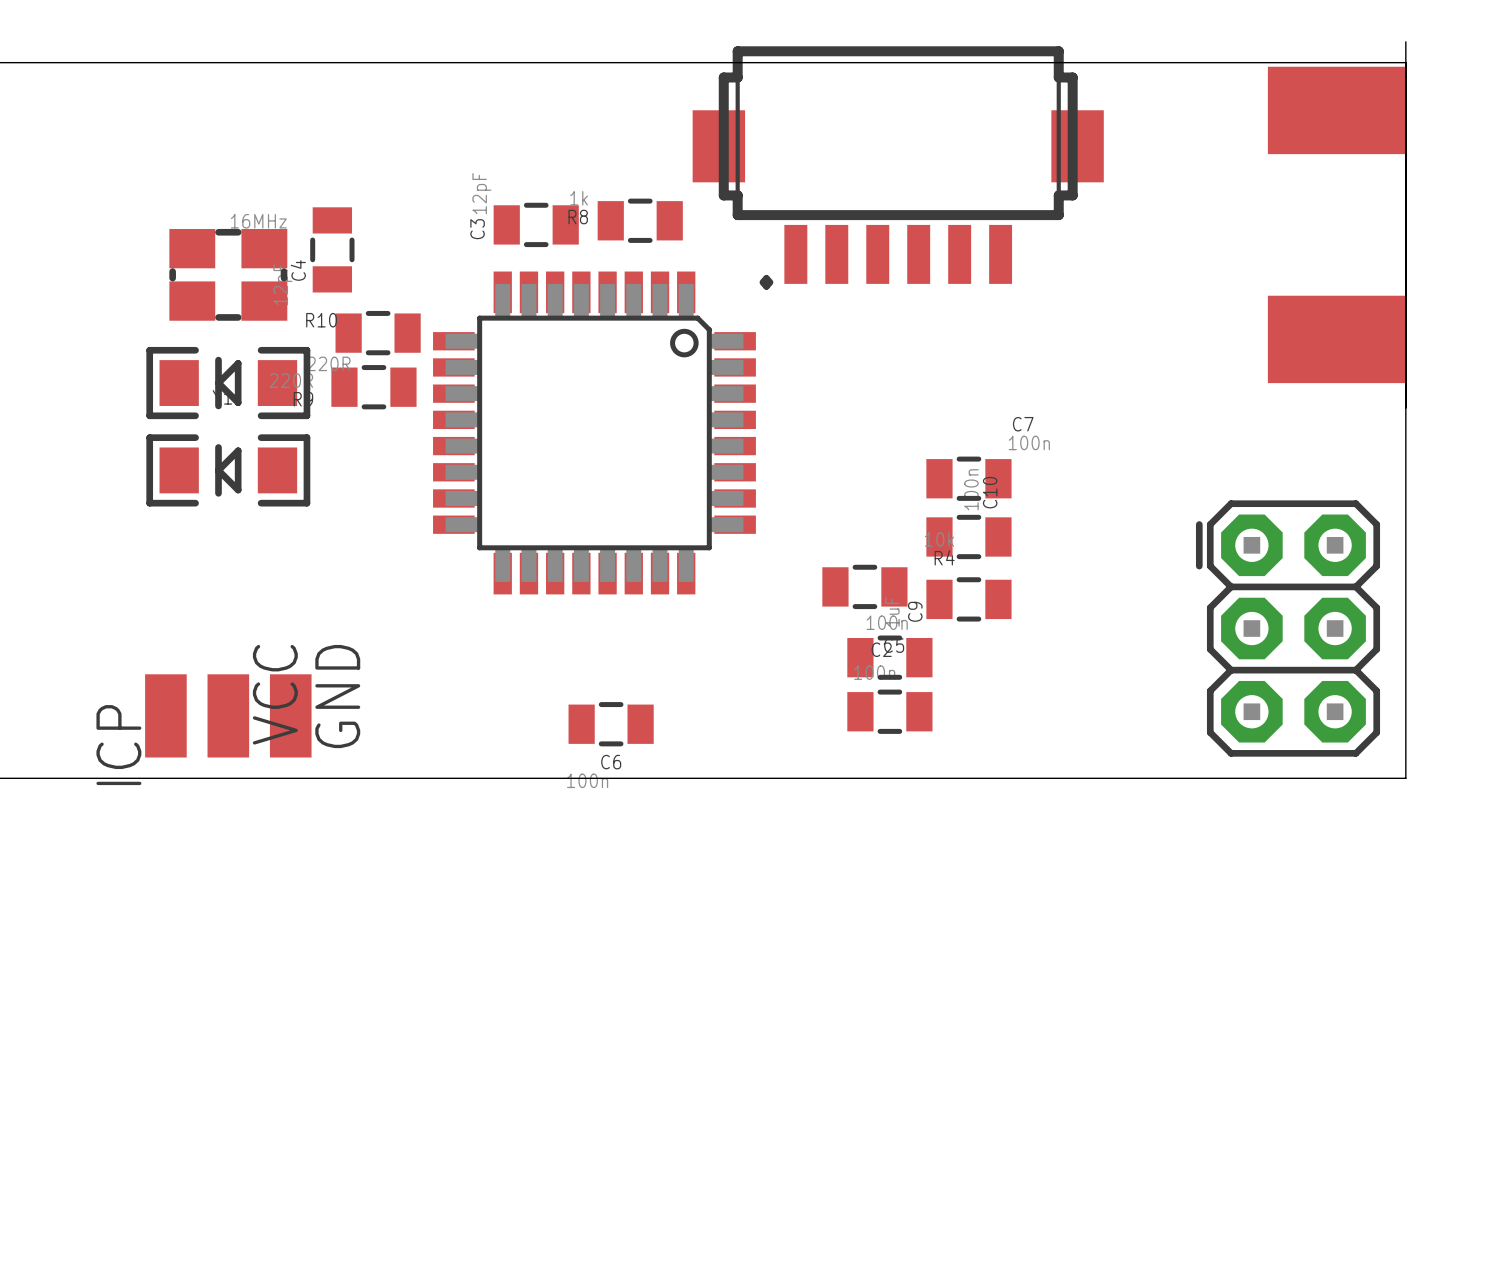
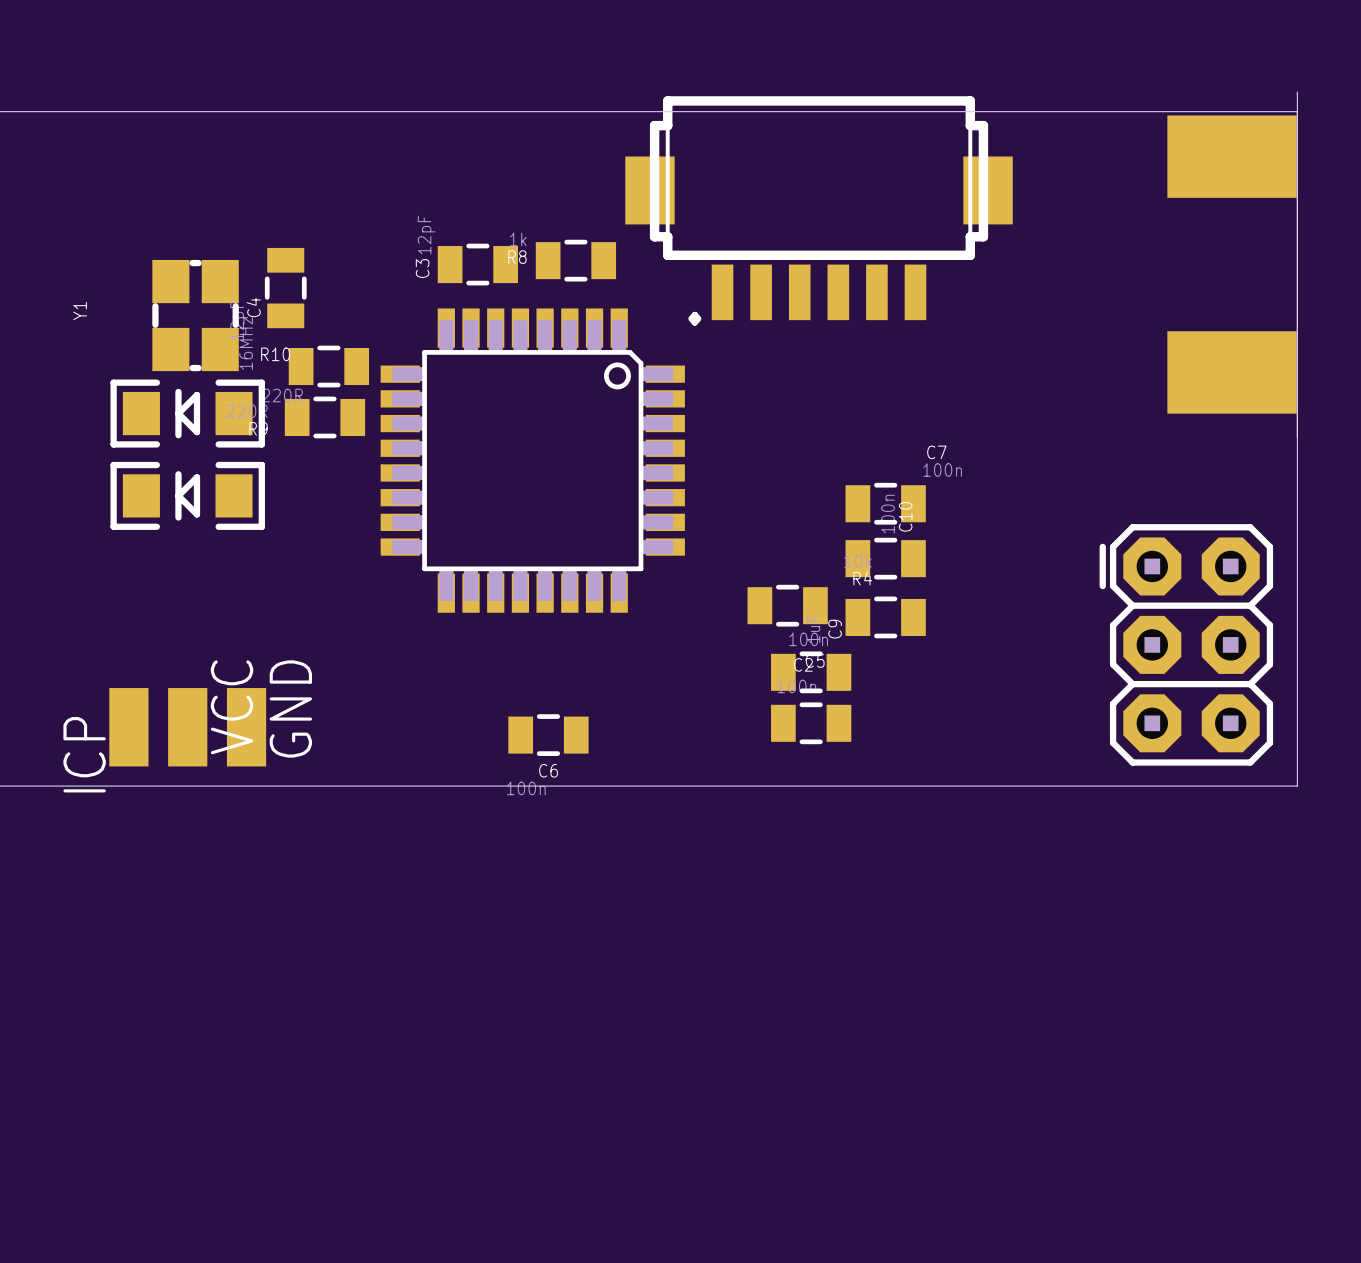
Y1 rotation: 0° (228, 274) -> 90° clockwise (195, 315)

